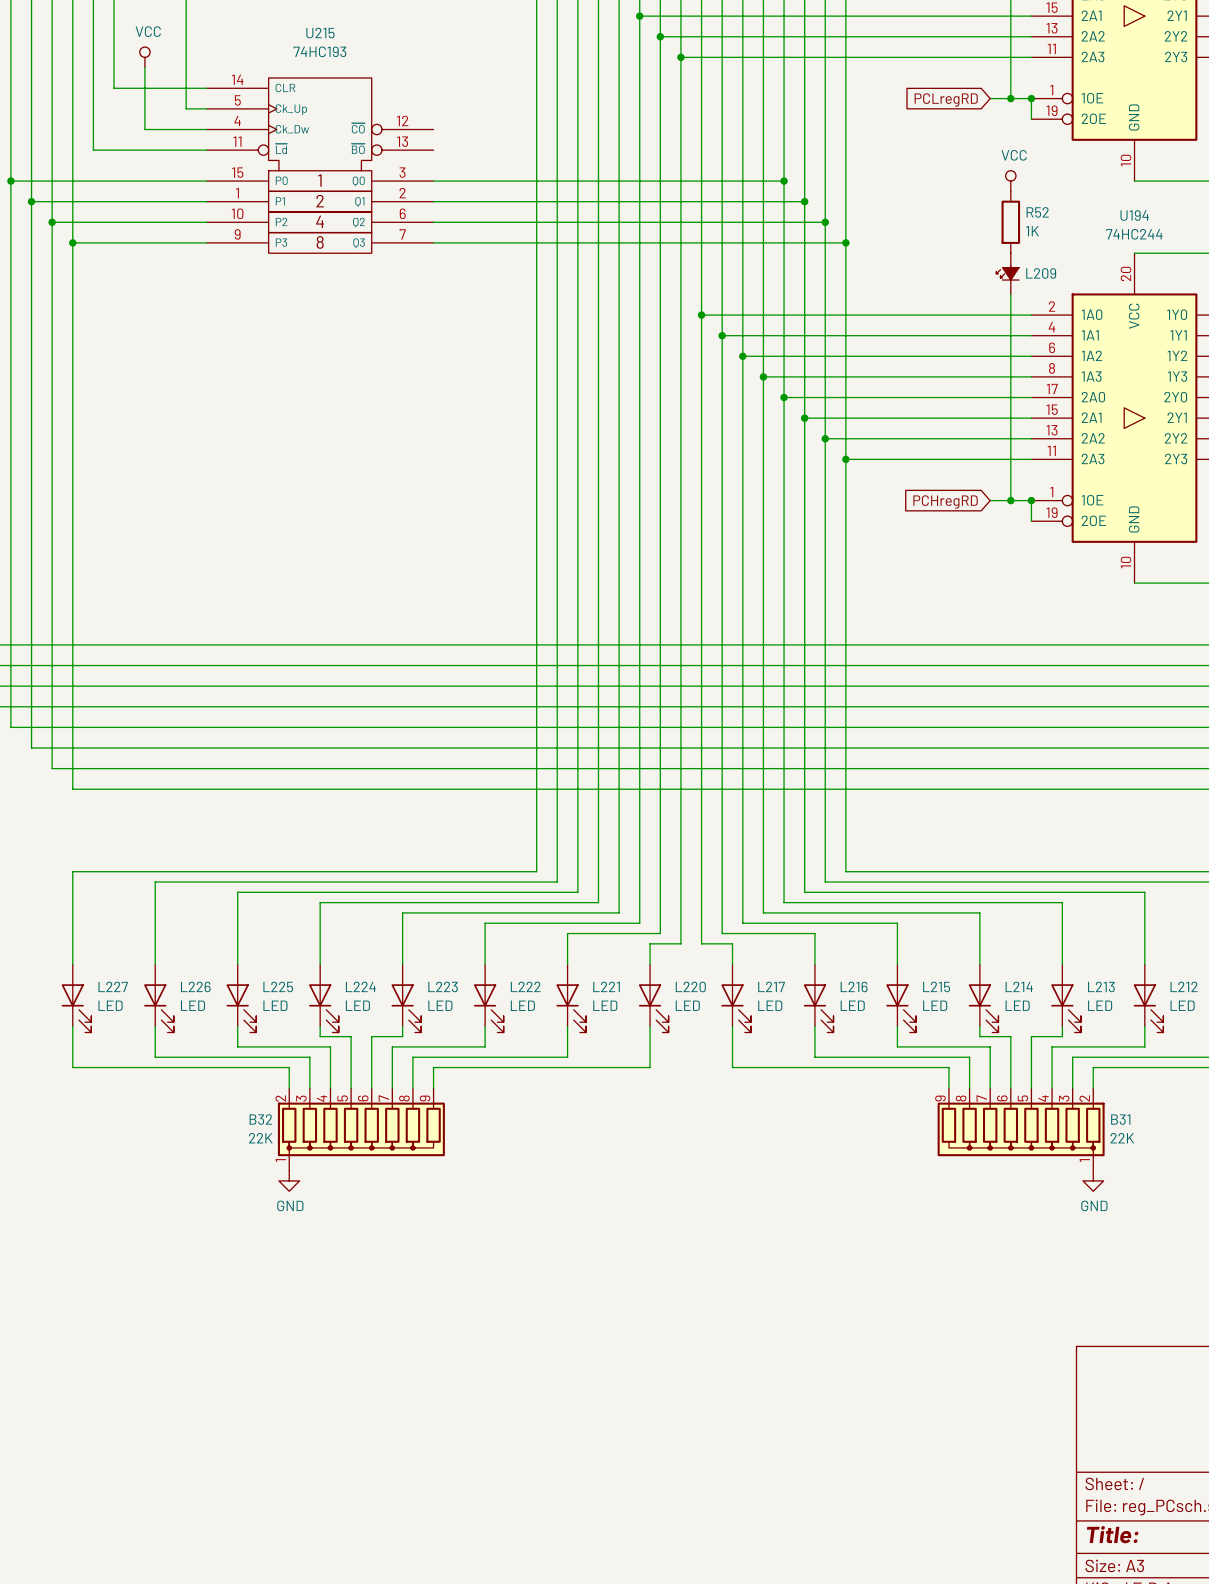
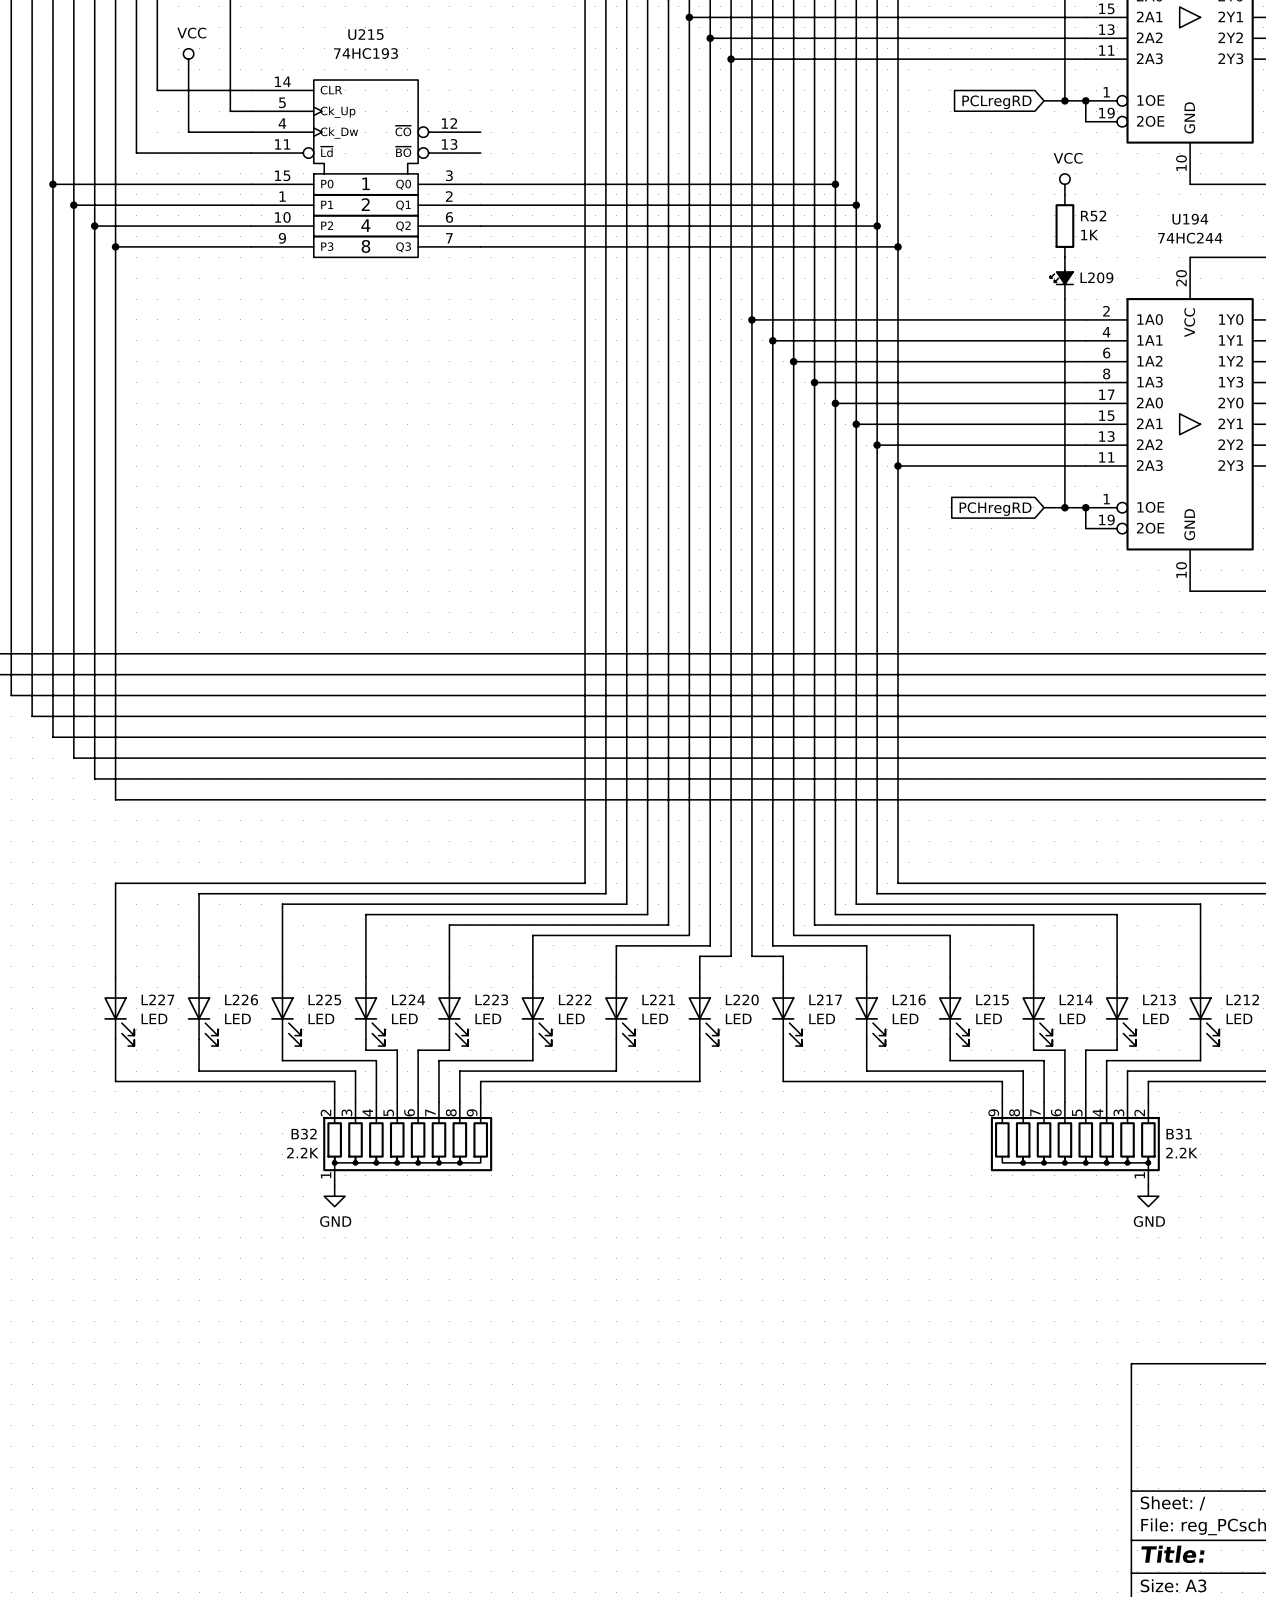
B32 value: 22K (260, 1138) -> 2.2K (302, 1153)
B31 value: 22K (1122, 1138) -> 2.2K (1181, 1153)

